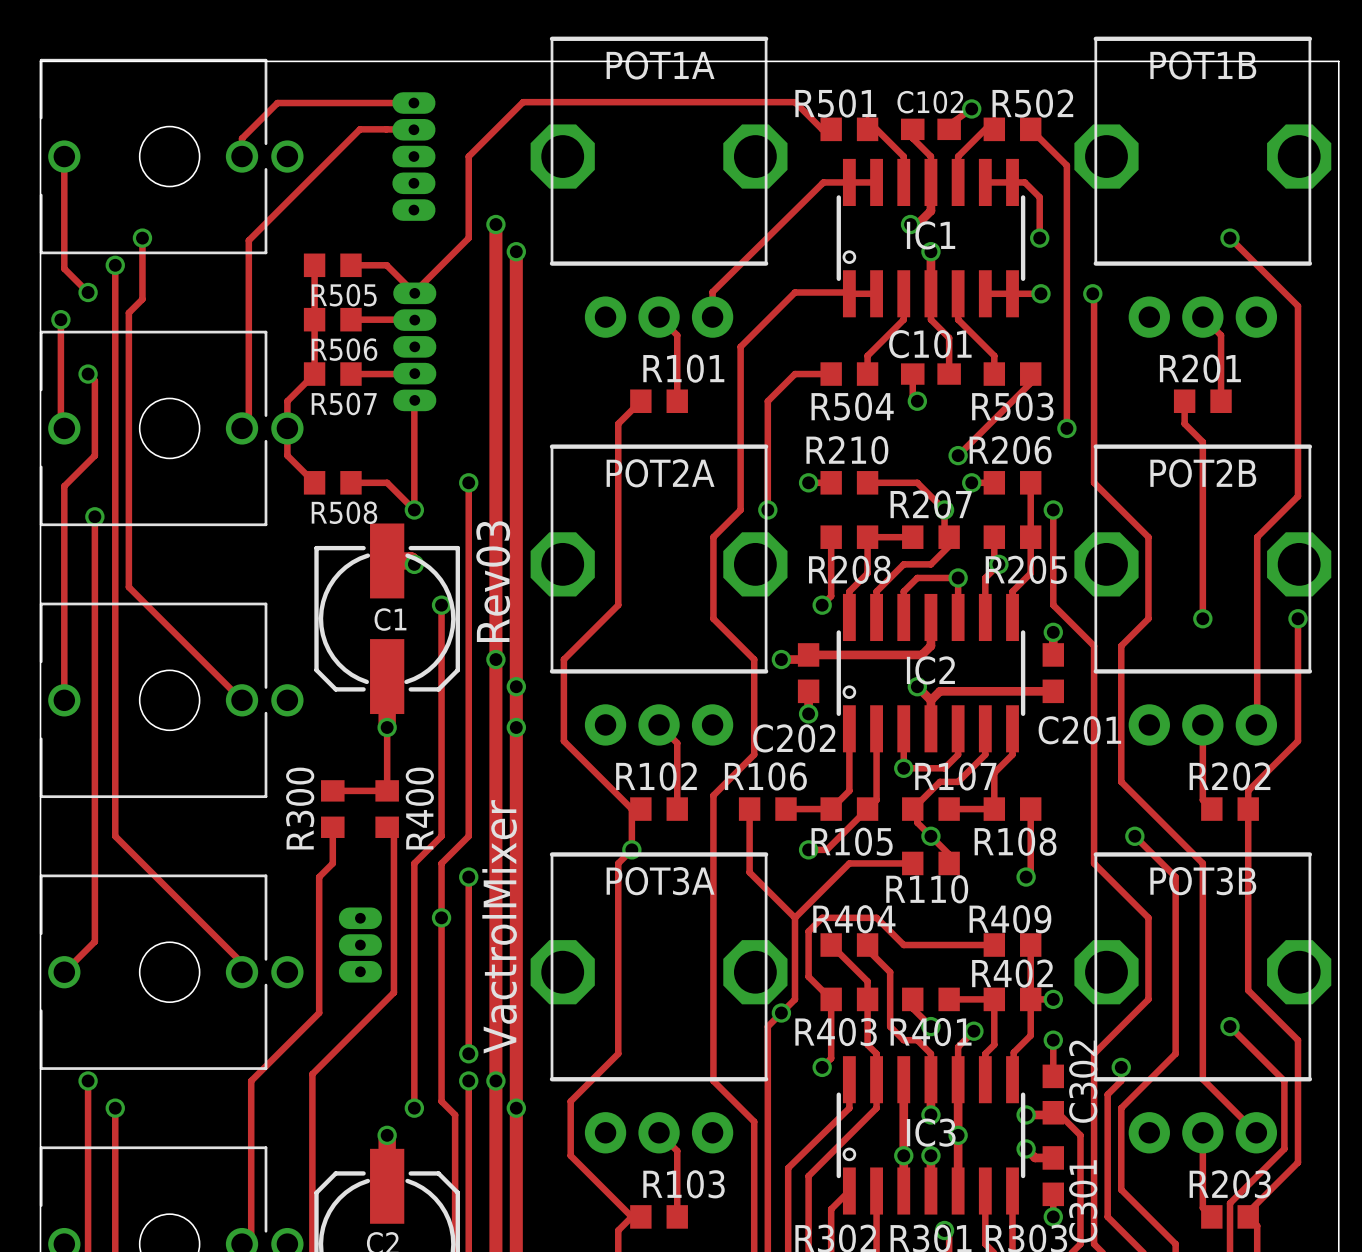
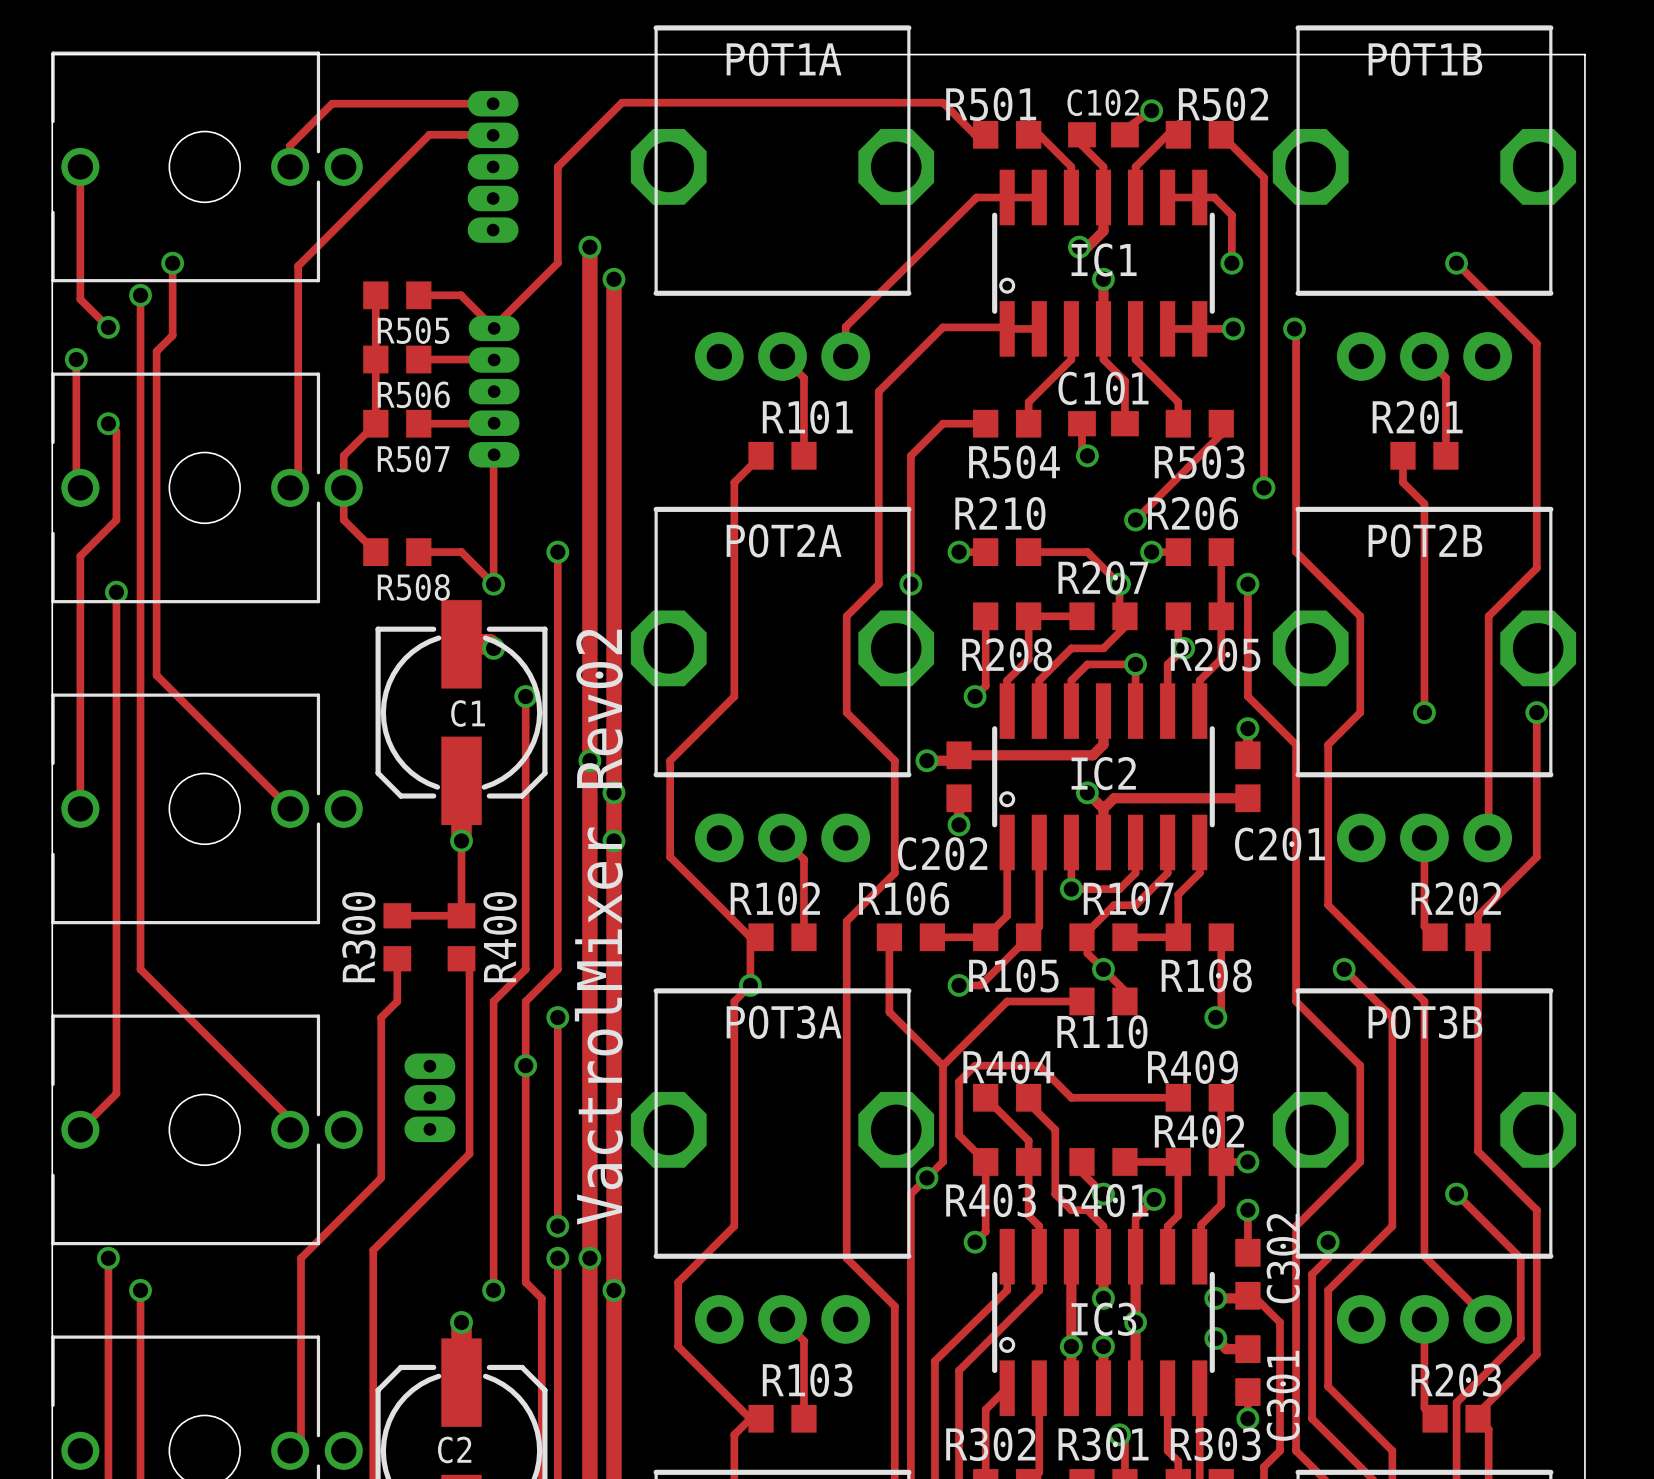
text: Rev03 (493, 581) -> none
text: VactrolMixer (499, 926) -> VactrolMixer Rev02 (598, 927)

